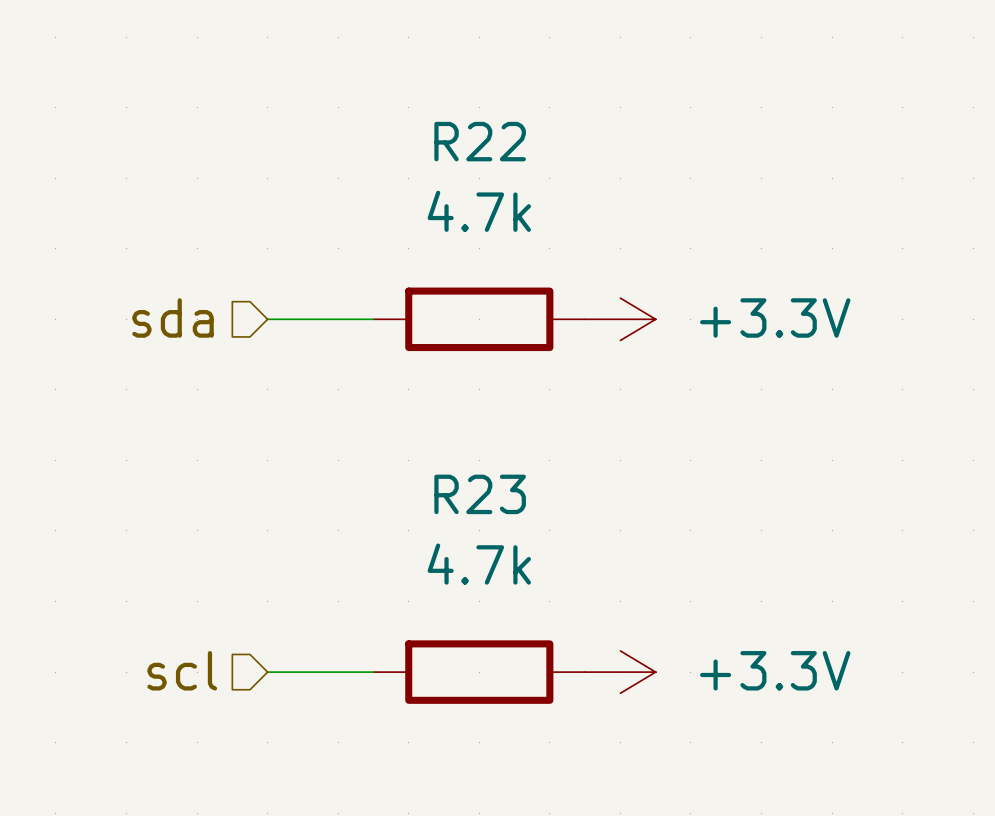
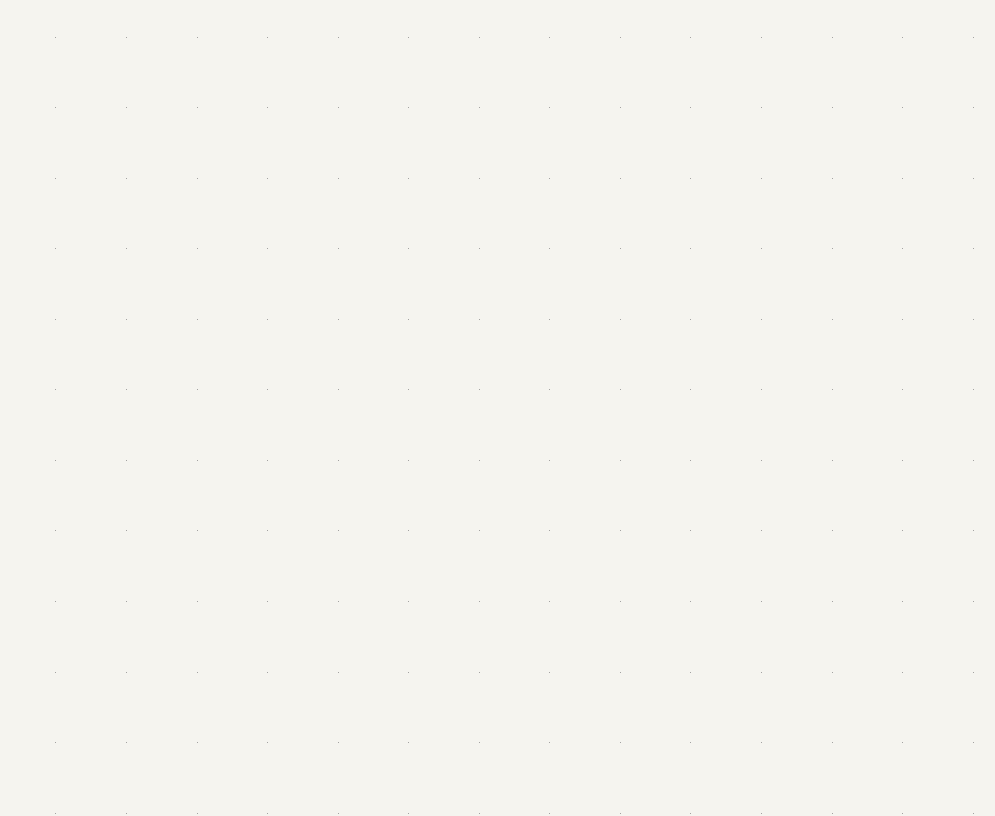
hierarchical label: sda (173, 317) -> none
wire: (267, 319) (373, 319) -> none
R22: 4.7k (479, 319) -> none
power symbol: +3.3V (620, 319) -> none
hierarchical label: scl (182, 670) -> none
wire: (267, 672) (373, 672) -> none
R23: 4.7k (479, 672) -> none
power symbol: +3.3V (620, 672) -> none

